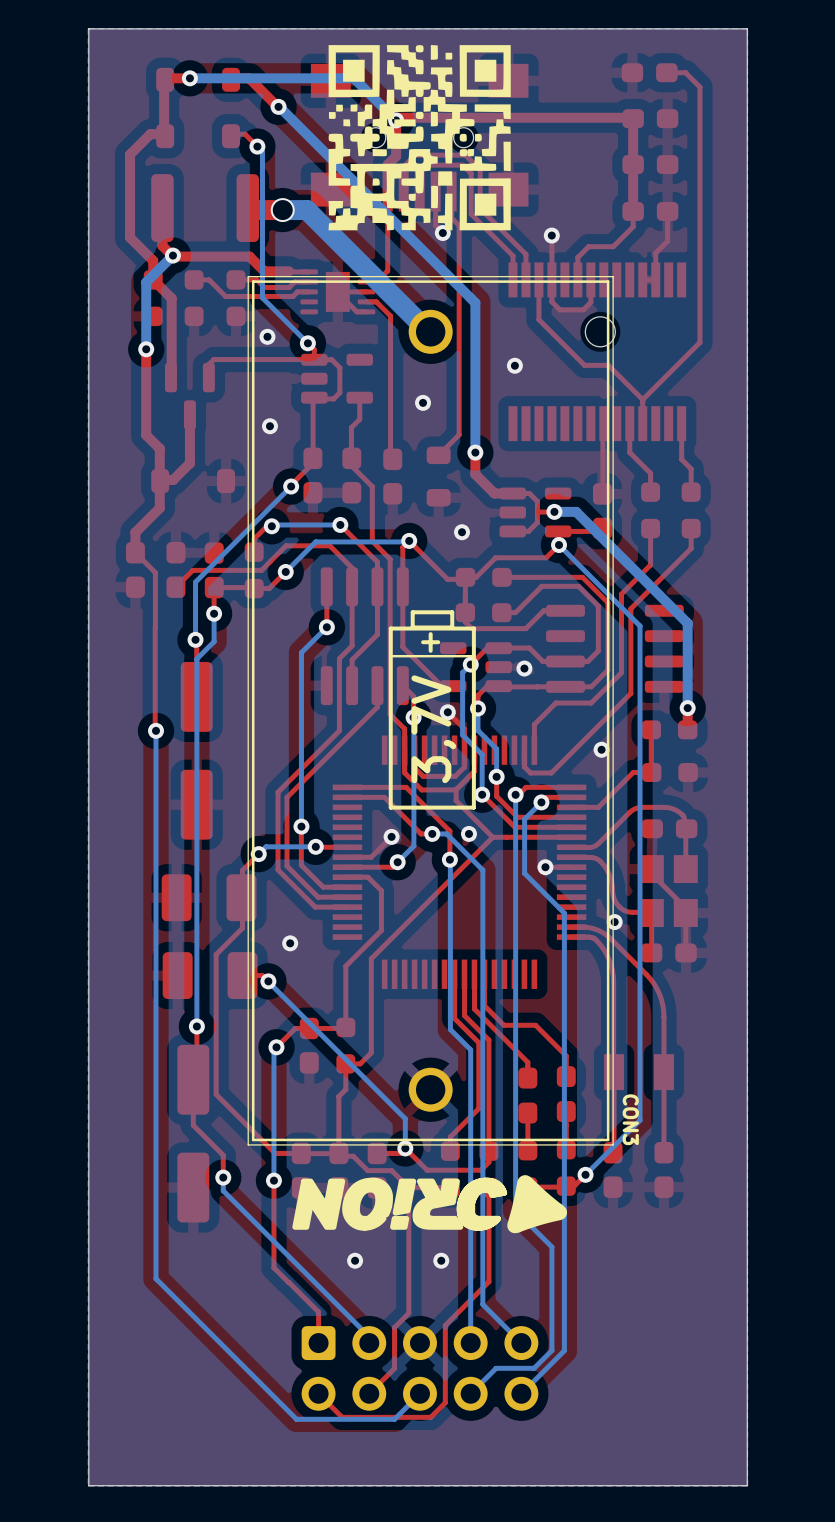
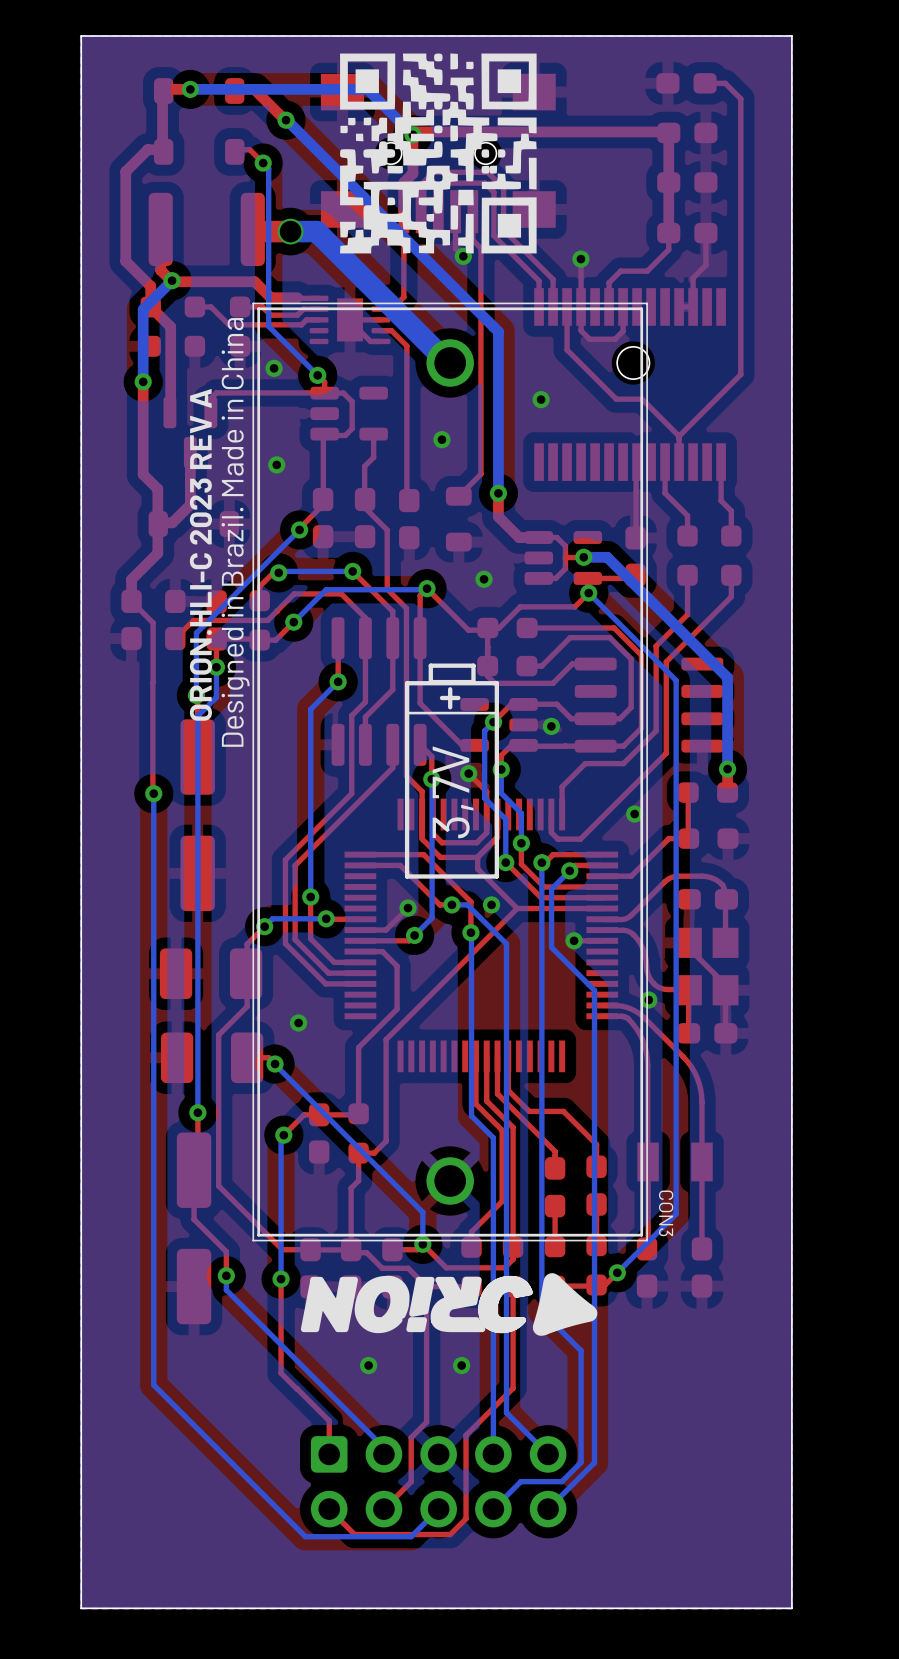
text: none -> Designed in Brazil. Made in China (235, 532)
text: none -> ORION.HLI-C 2023 REV A (200, 554)

